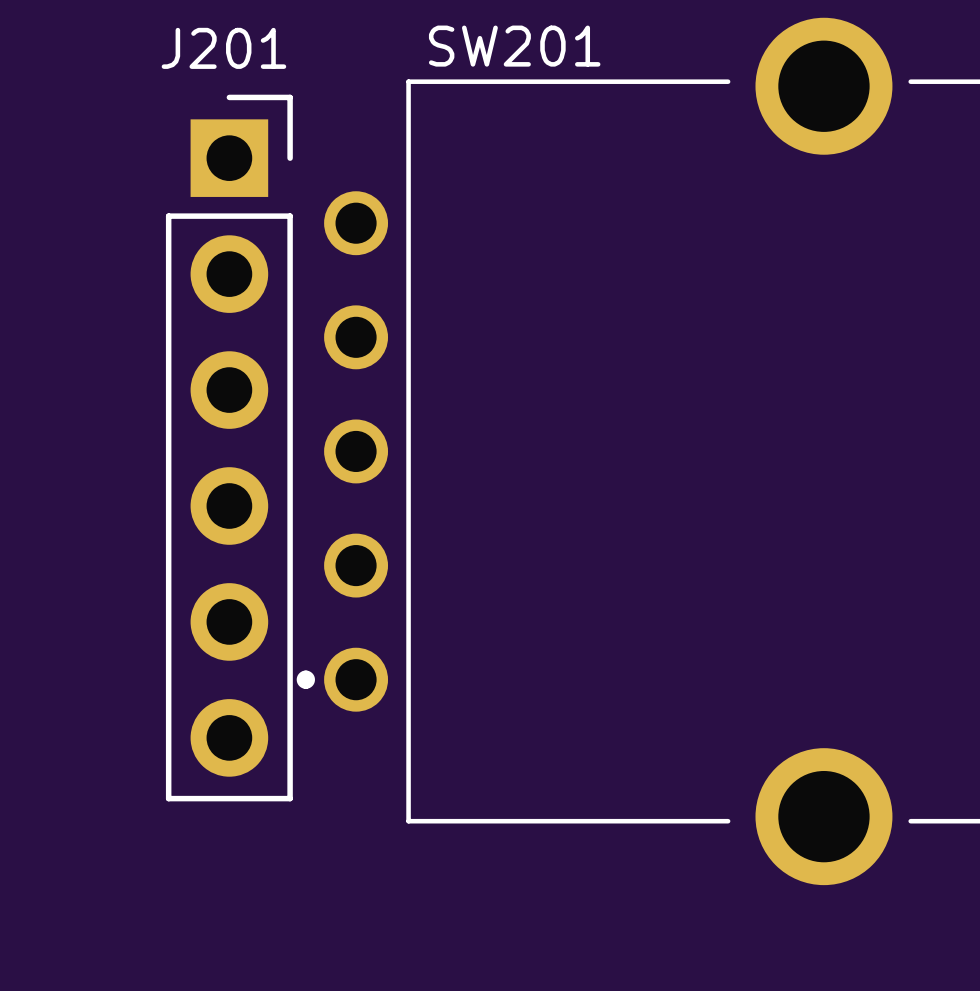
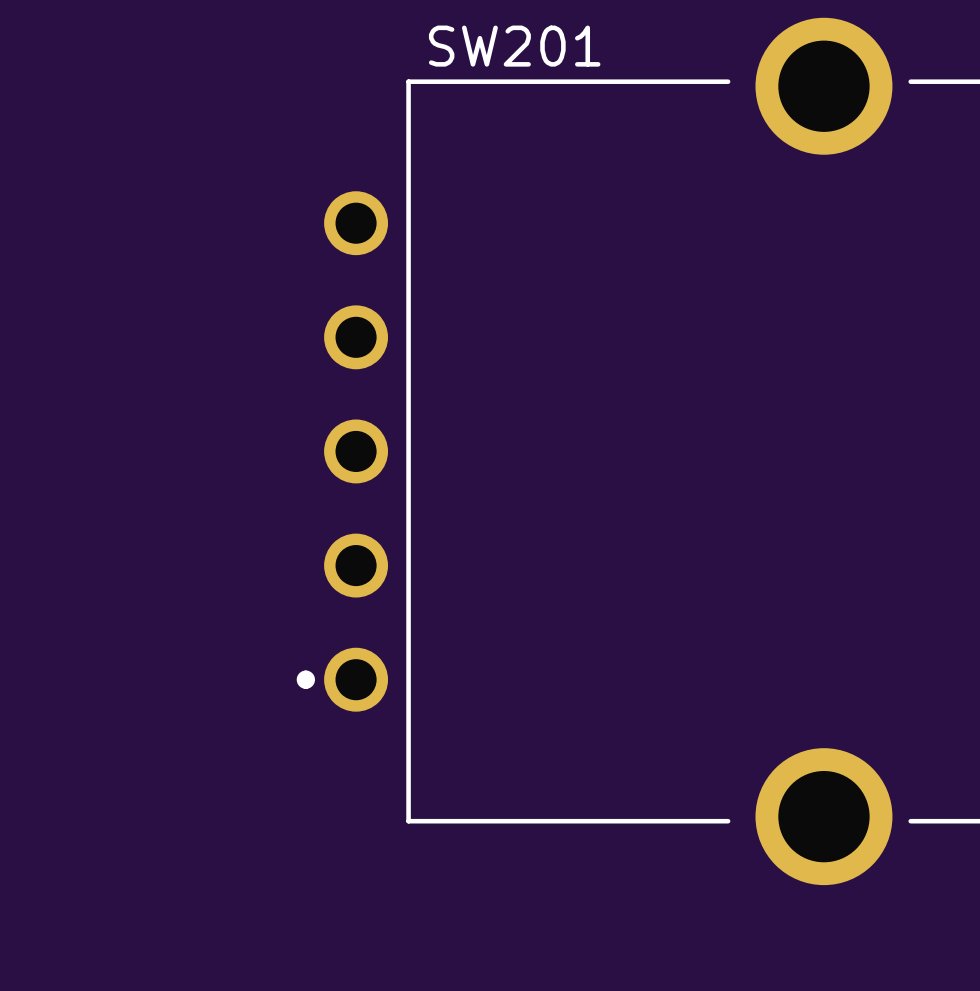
J201: (229, 448) -> none

